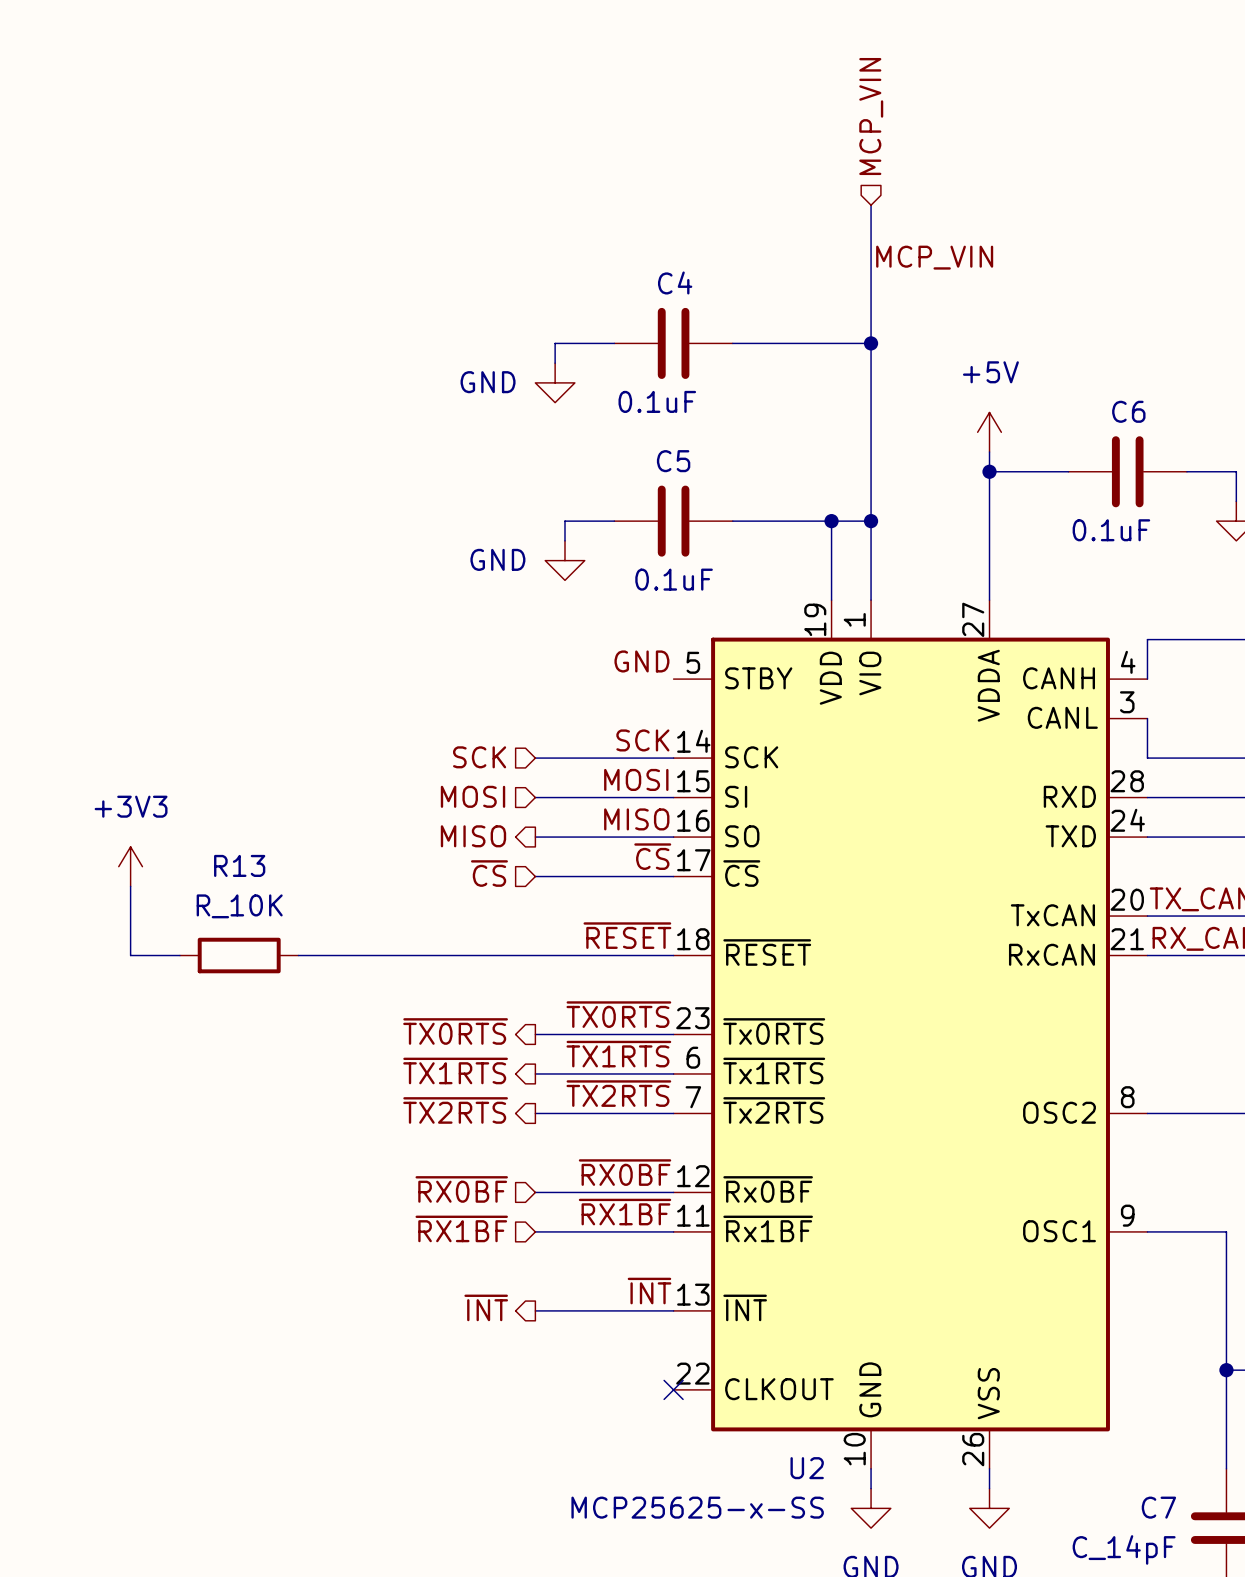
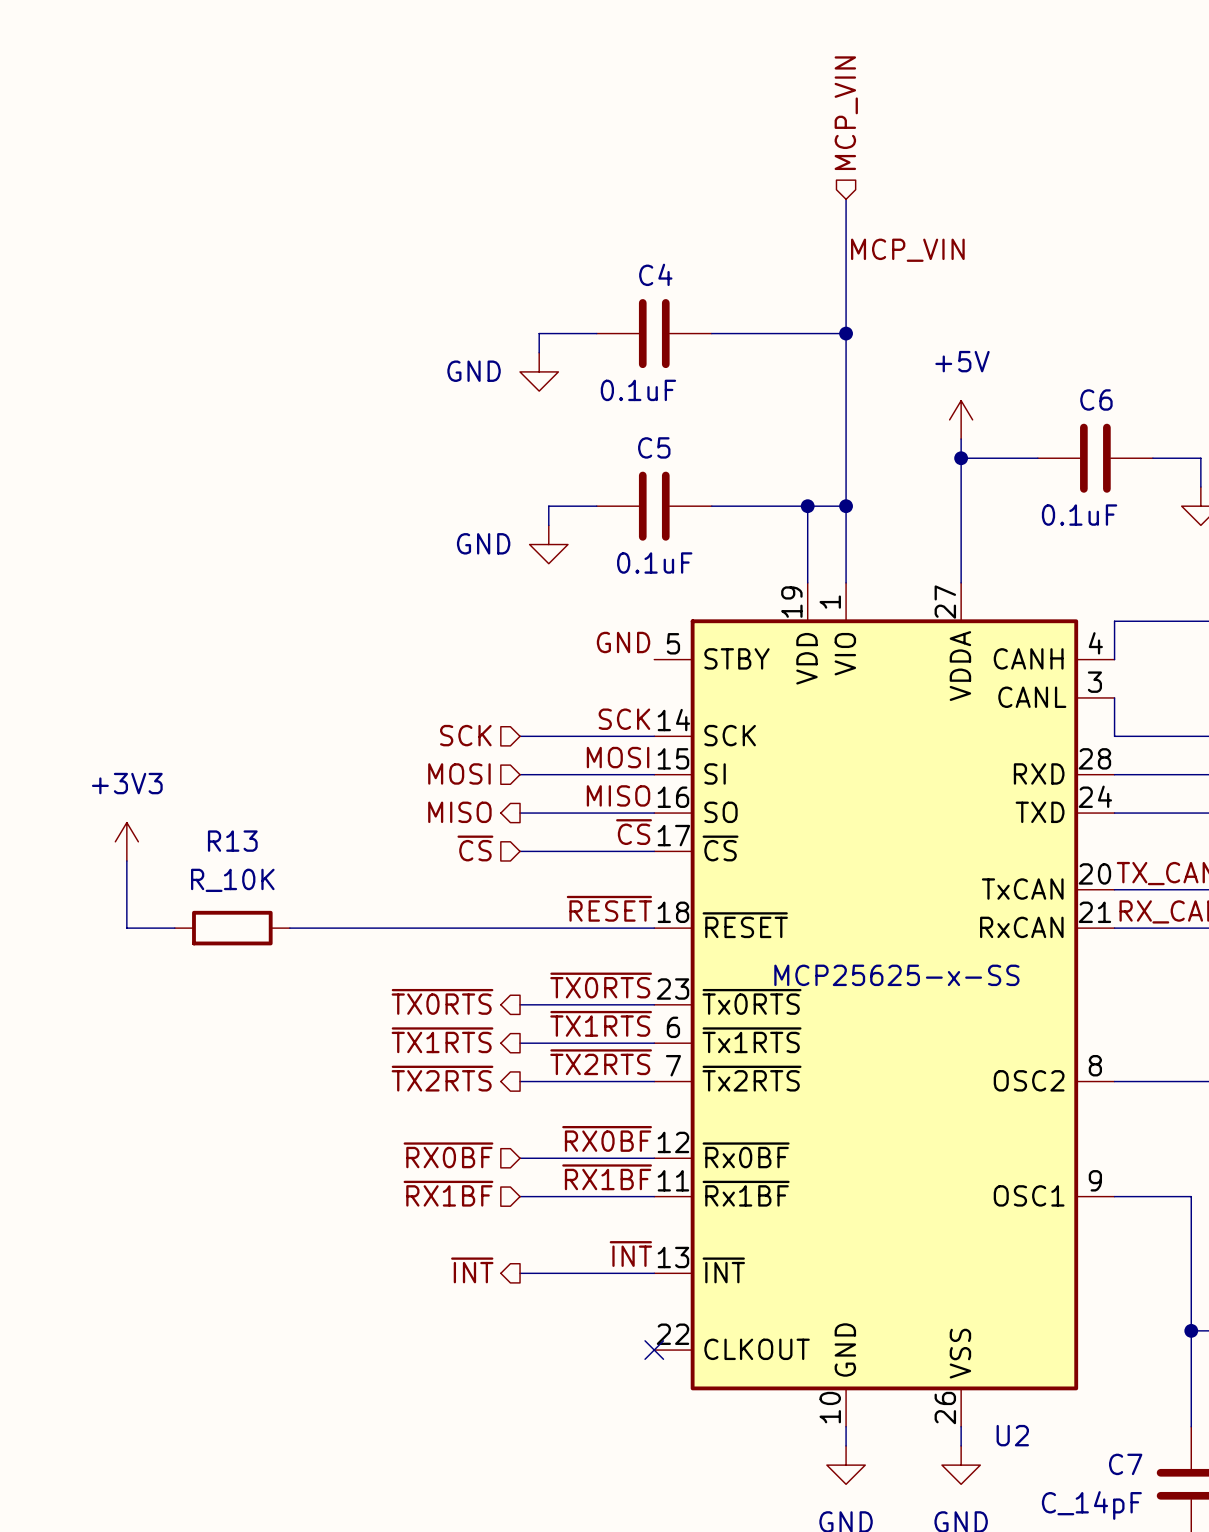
U2 name position: U2 (807, 1468) -> U2 (1012, 1435)
U2 value position: MCP25625-x-SS (697, 1507) -> MCP25625-x-SS (896, 975)

